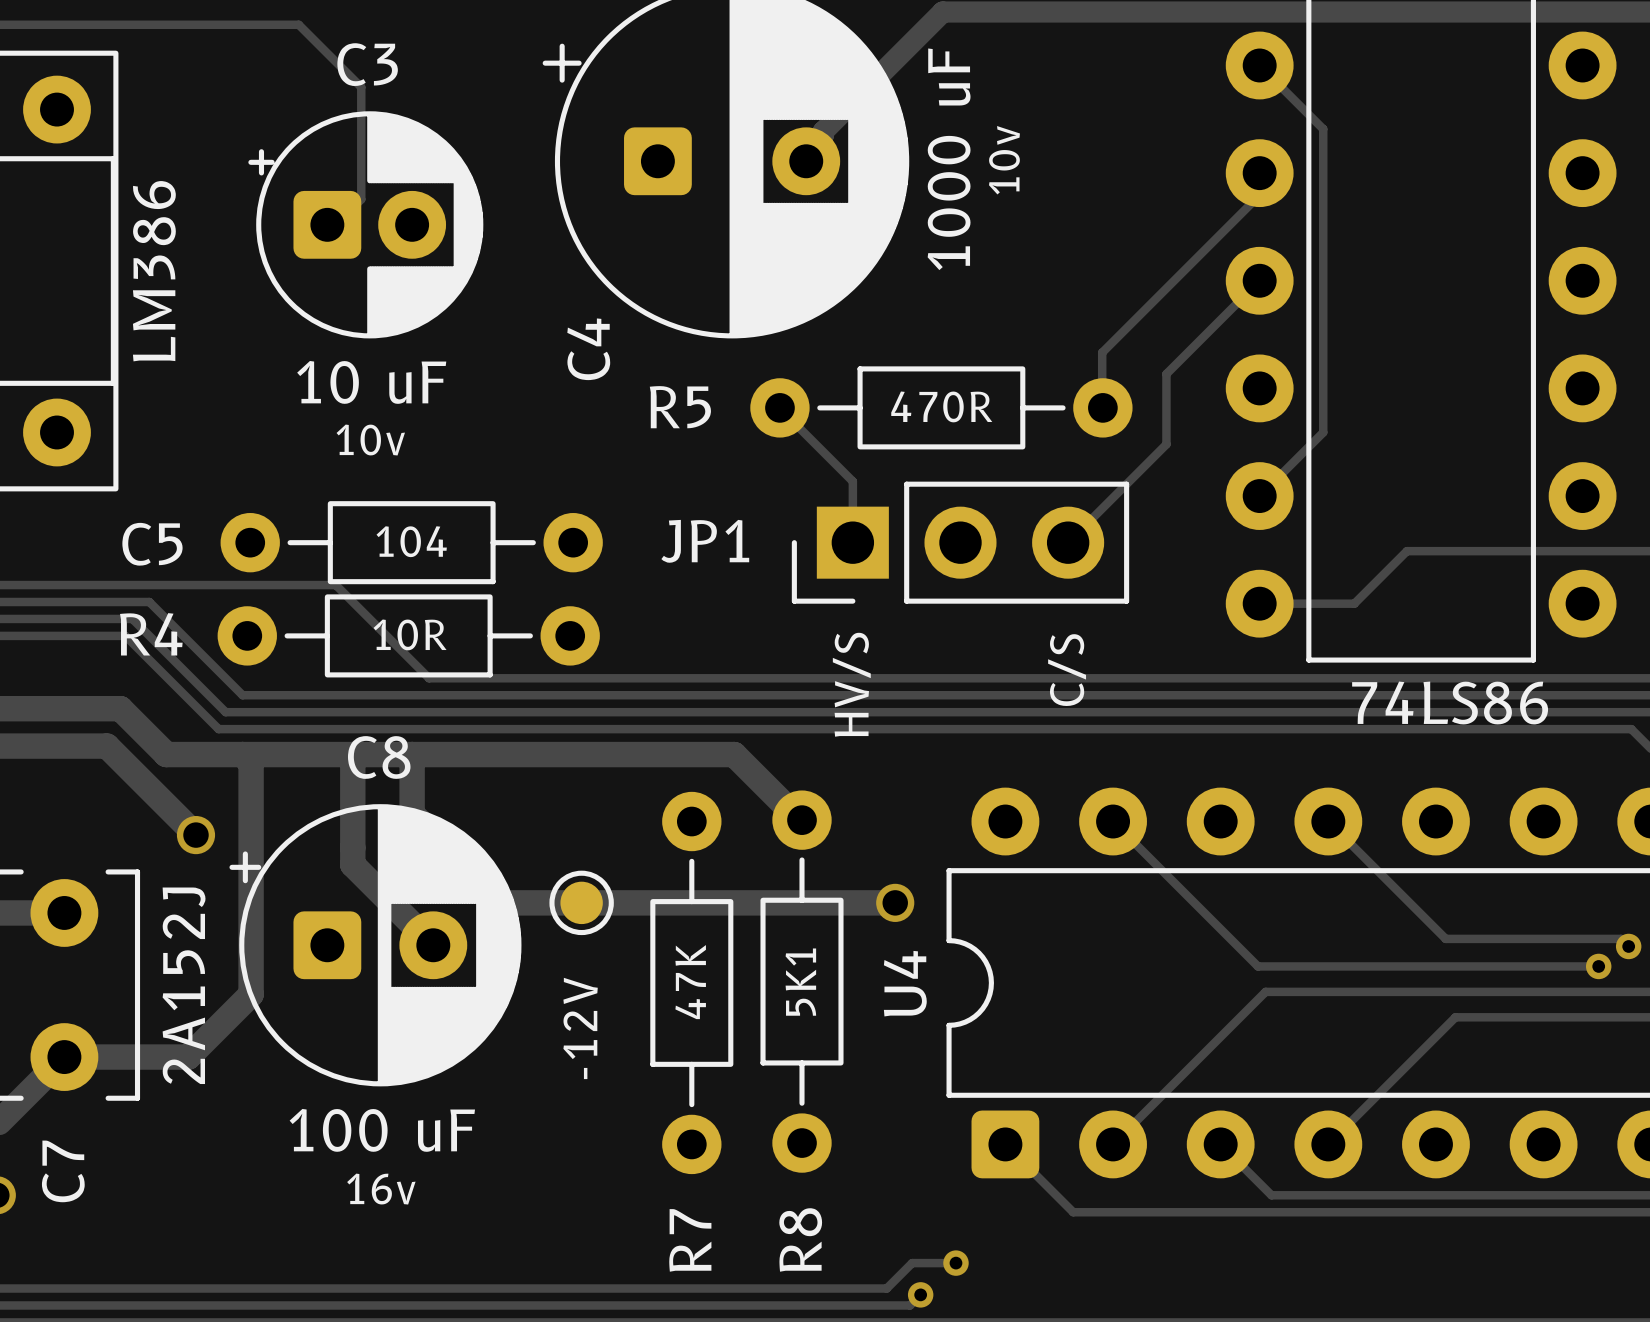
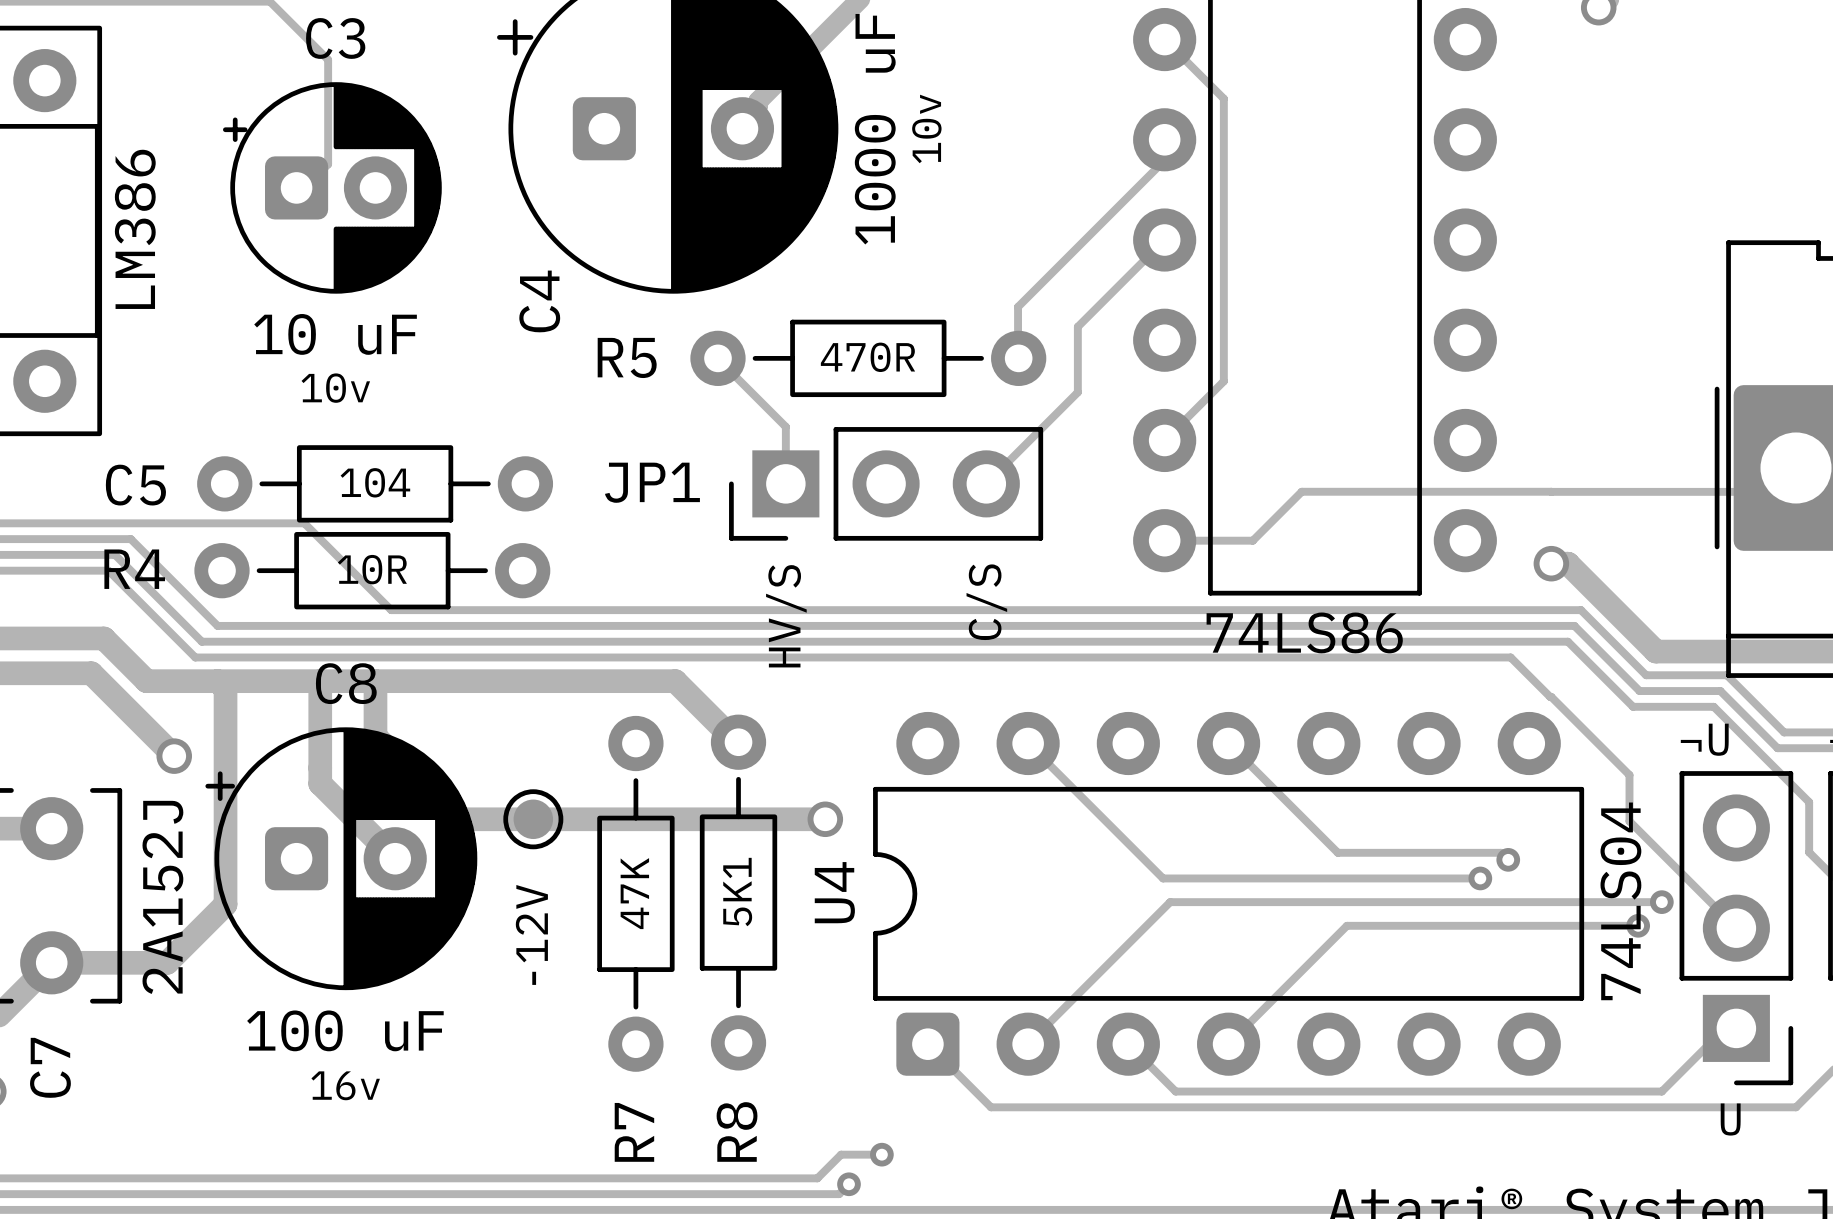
text position: 74LS86 (1450, 702) -> 74LS86 (1304, 632)

